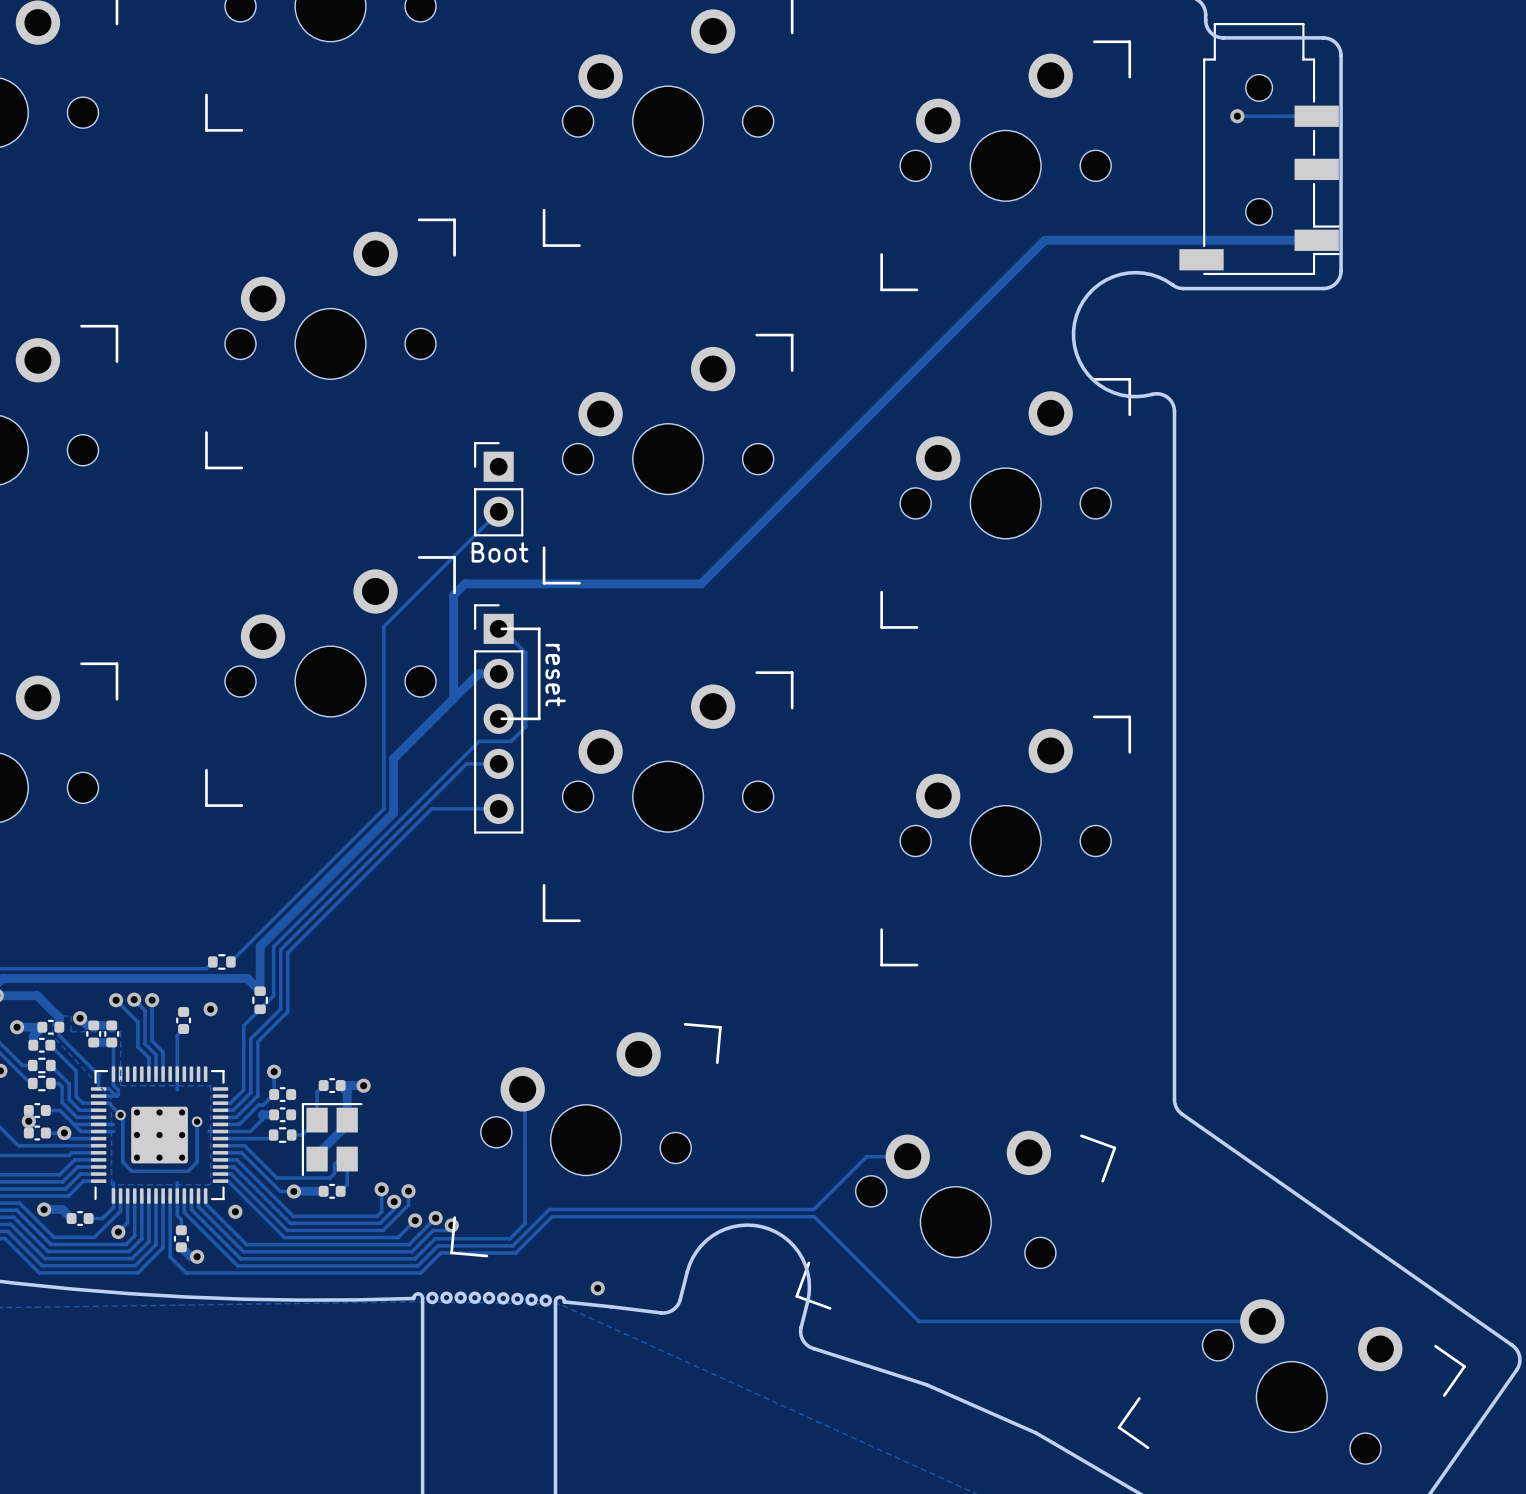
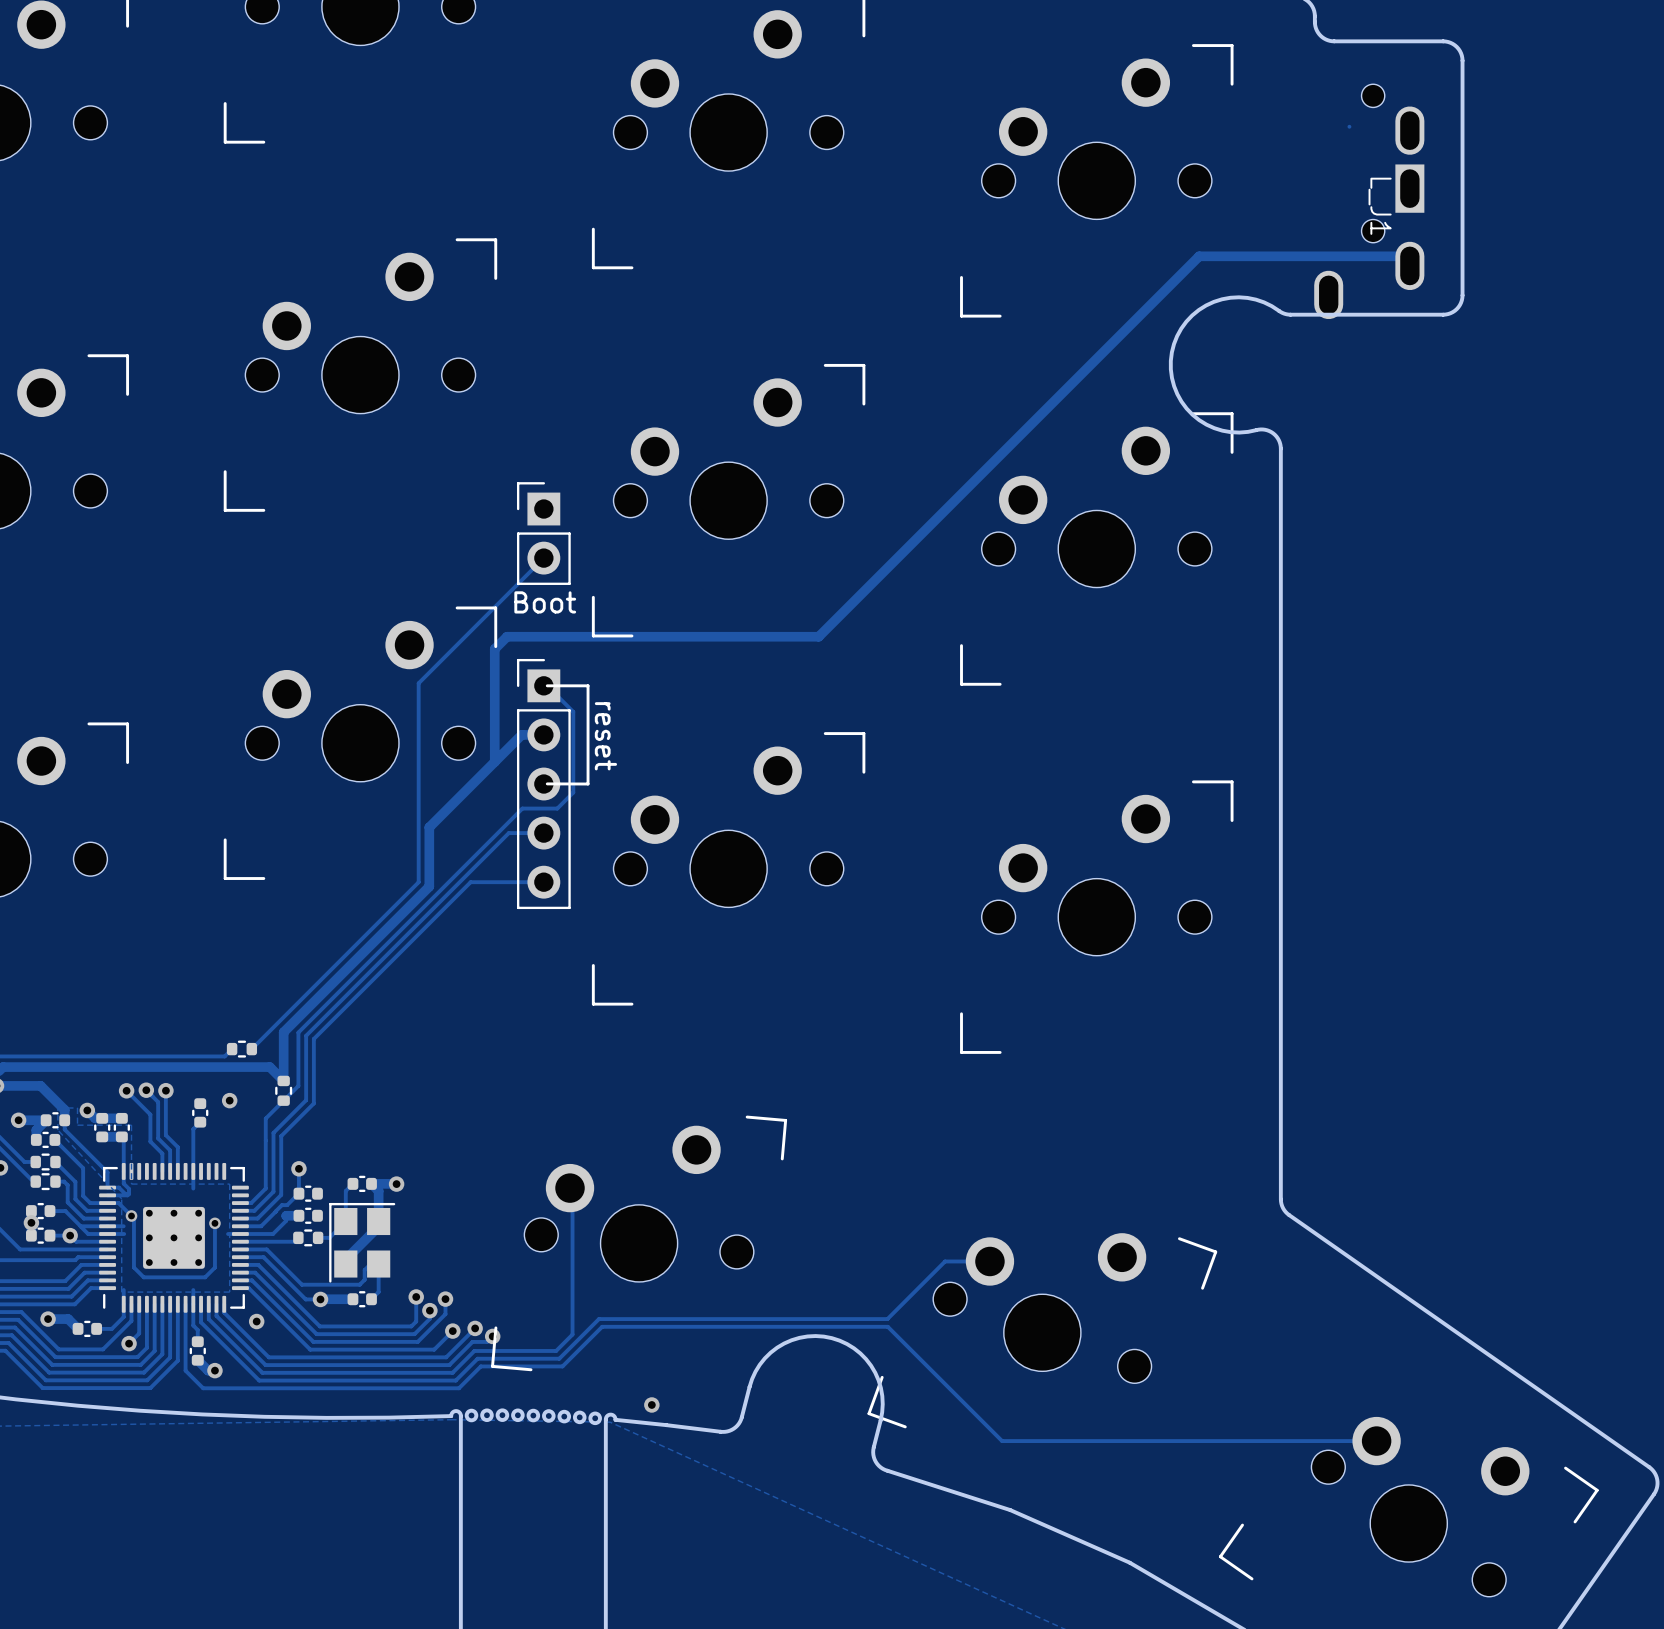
track: (1237, 116) (1316, 116) -> none
via: (1237, 116) -> none
part: (1259, 149) -> none
L_J1: none -> (1369, 201)
track: (1316, 240) (1044, 240) (701, 583) -> (1409, 265) (1400, 256) (1199, 256) (818, 636) (764, 636)

